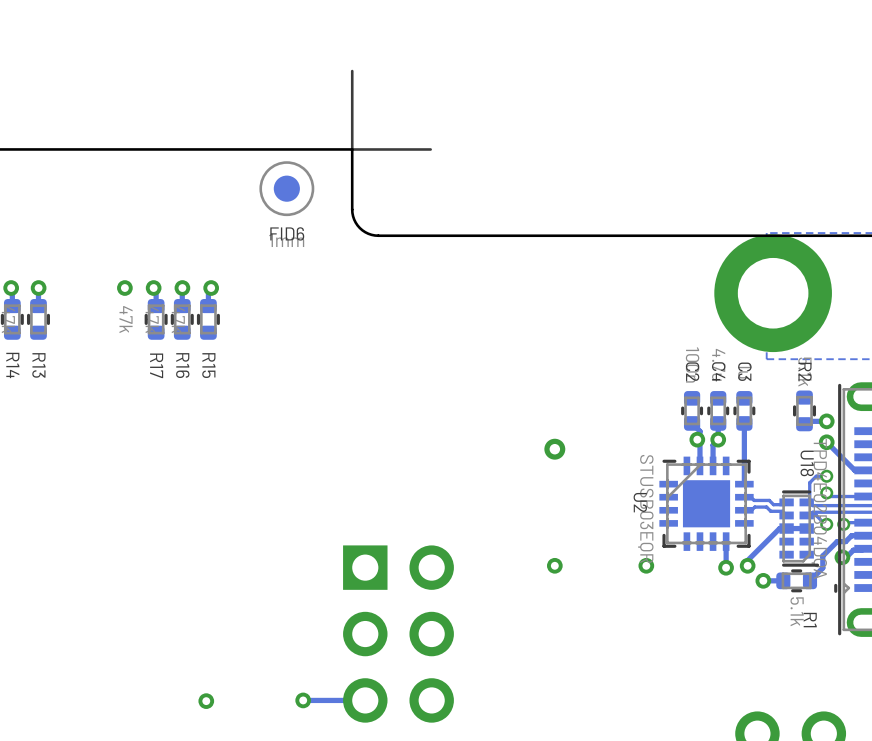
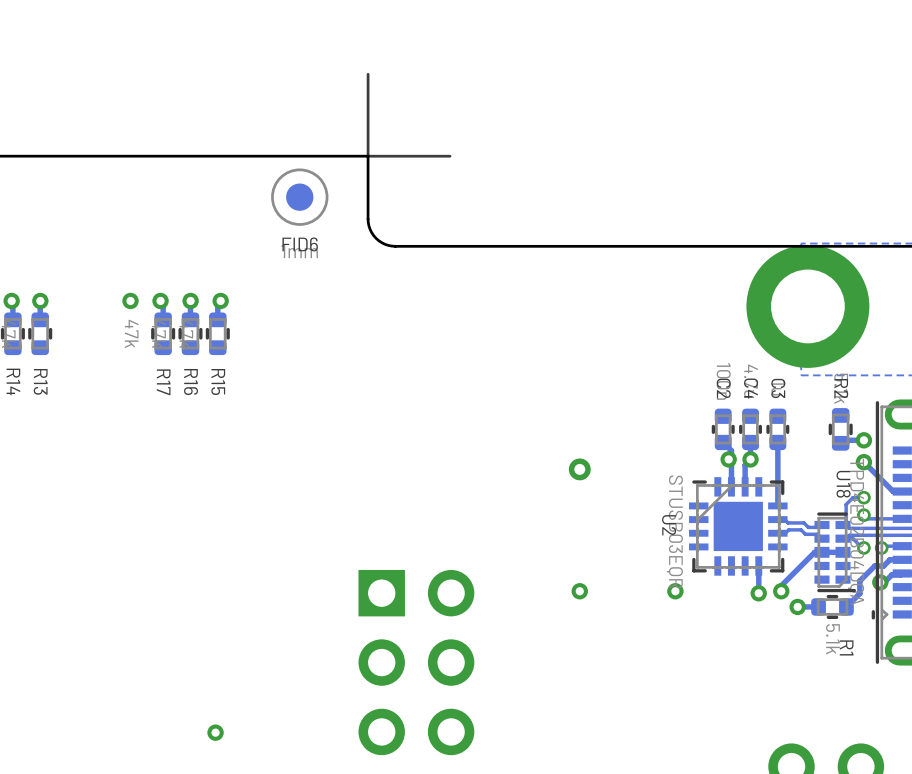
via: (303, 700) -> none
track: (365, 700) (303, 700) -> none

